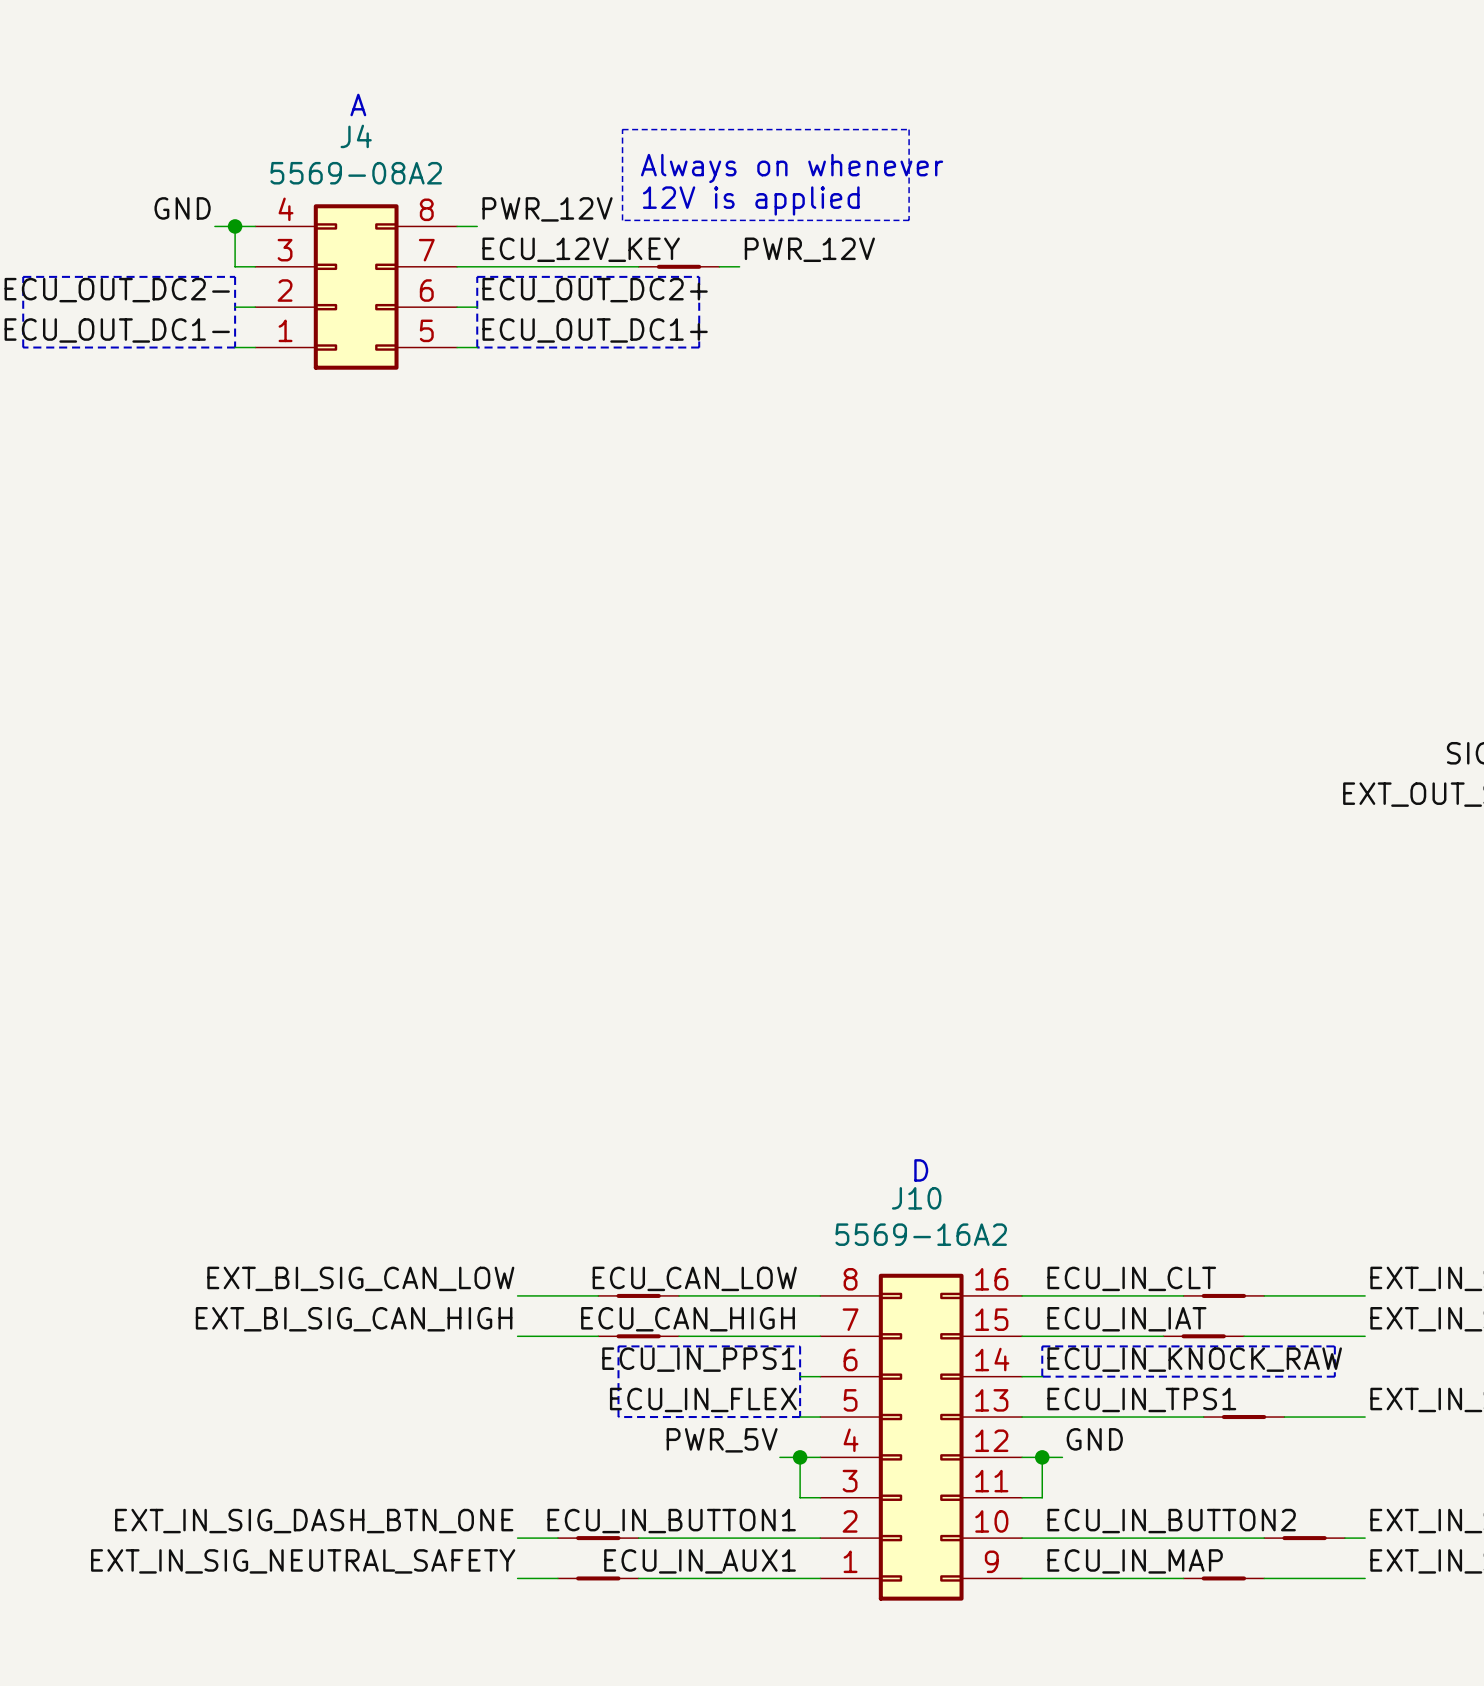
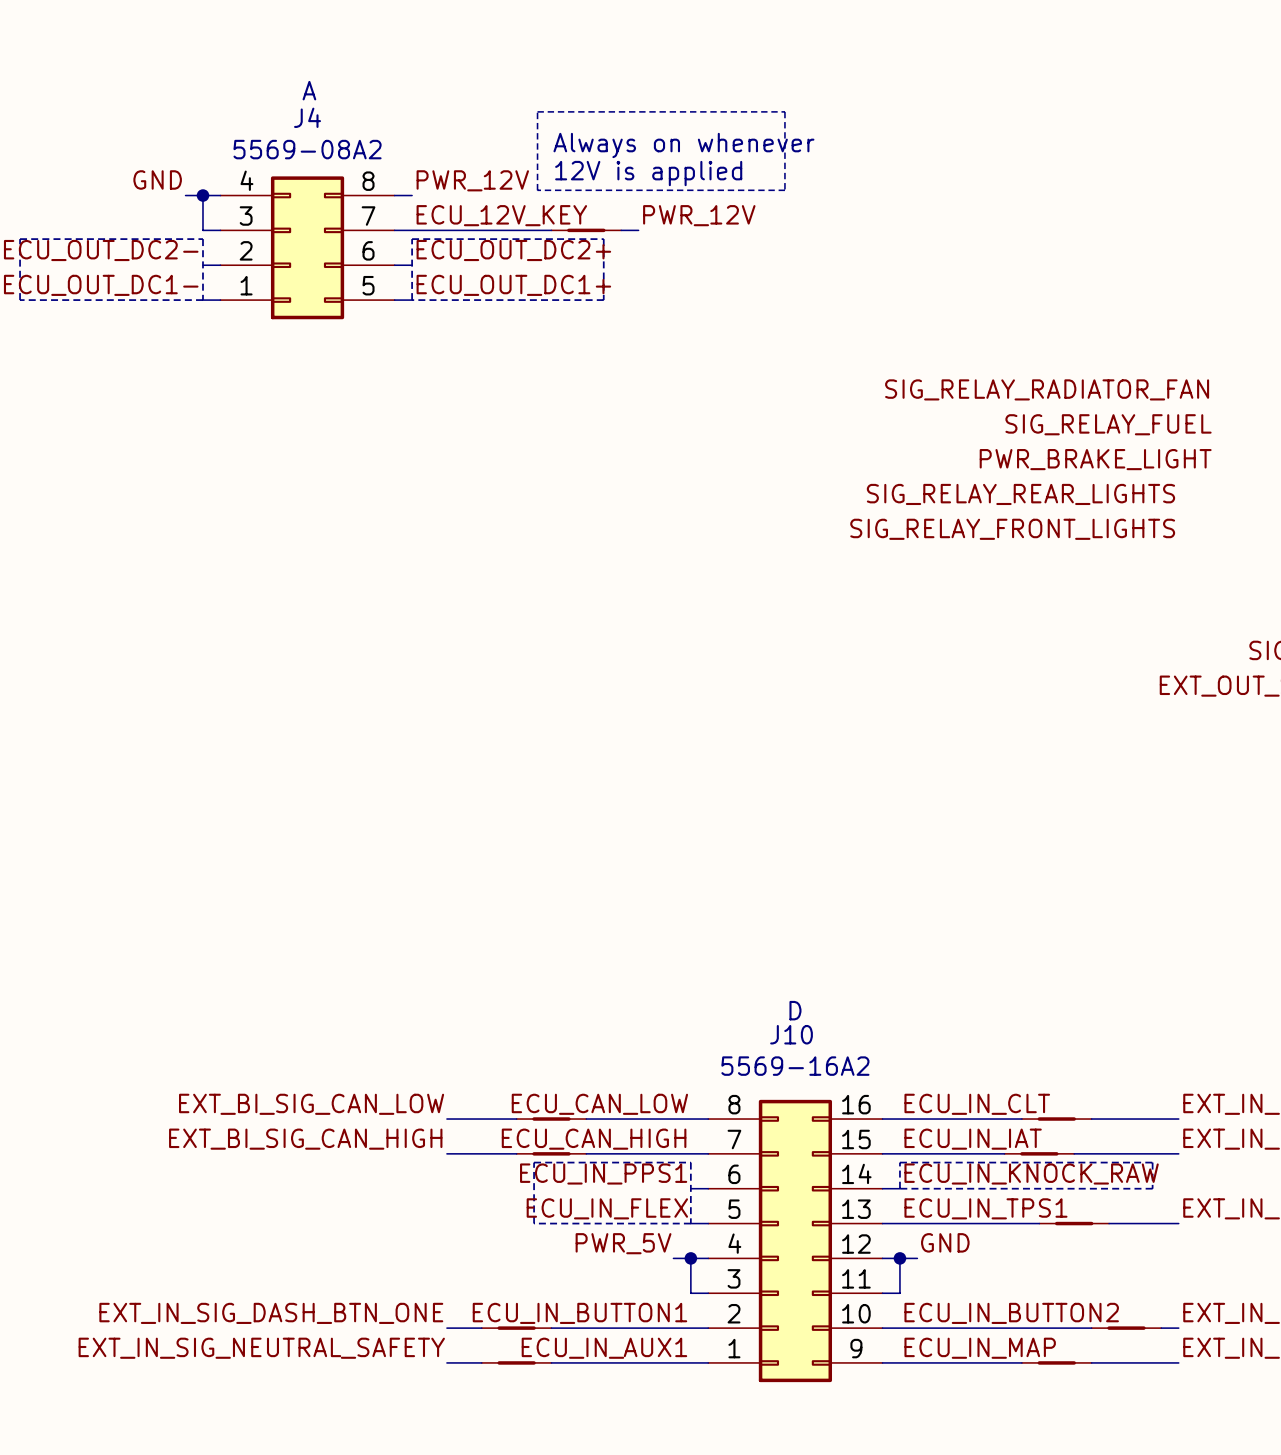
label: none -> SIG_RELAY_RADIATOR_FAN (1047, 389)
label: none -> SIG_RELAY_FUEL (1108, 424)
label: none -> PWR_BRAKE_LIGHT (1095, 459)
label: none -> SIG_RELAY_REAR_LIGHTS (1020, 494)
label: none -> SIG_RELAY_FRONT_LIGHTS (1012, 529)

